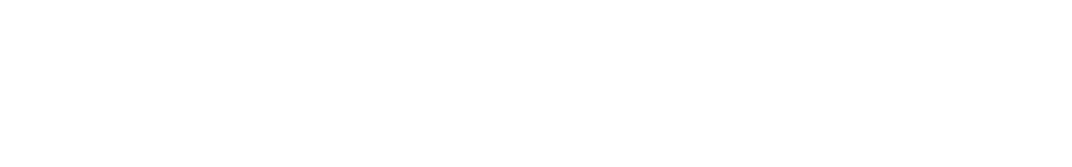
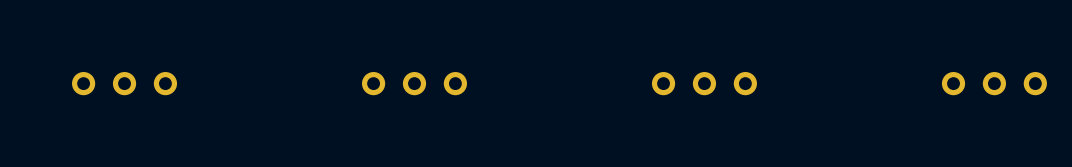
part: none -> (124, 83)
part: none -> (414, 83)
part: none -> (704, 83)
part: none -> (994, 83)

